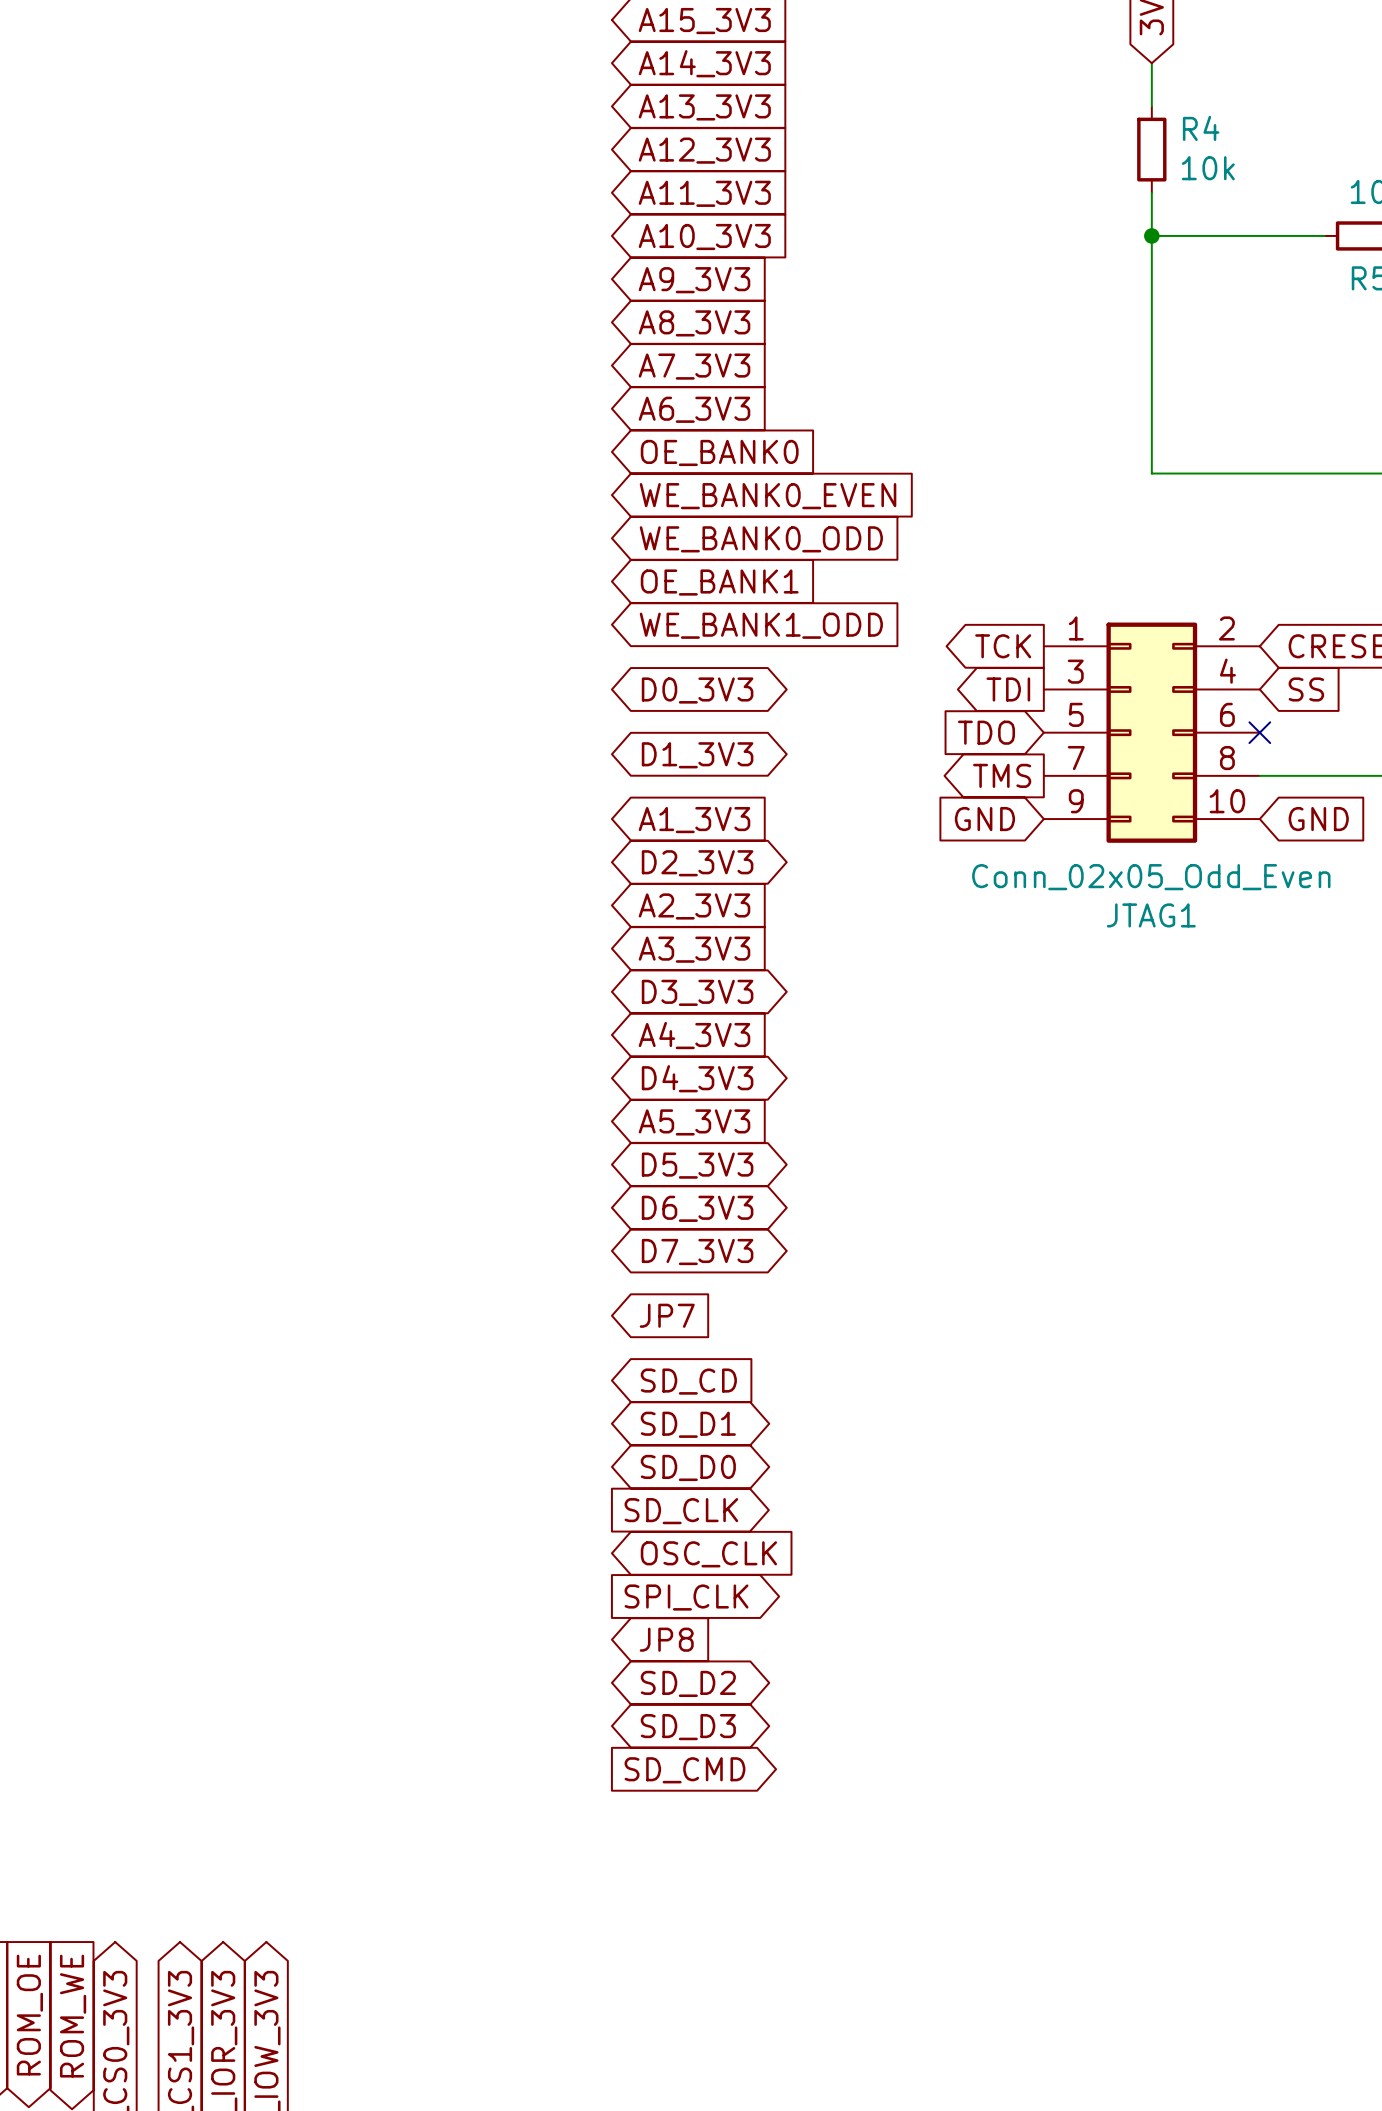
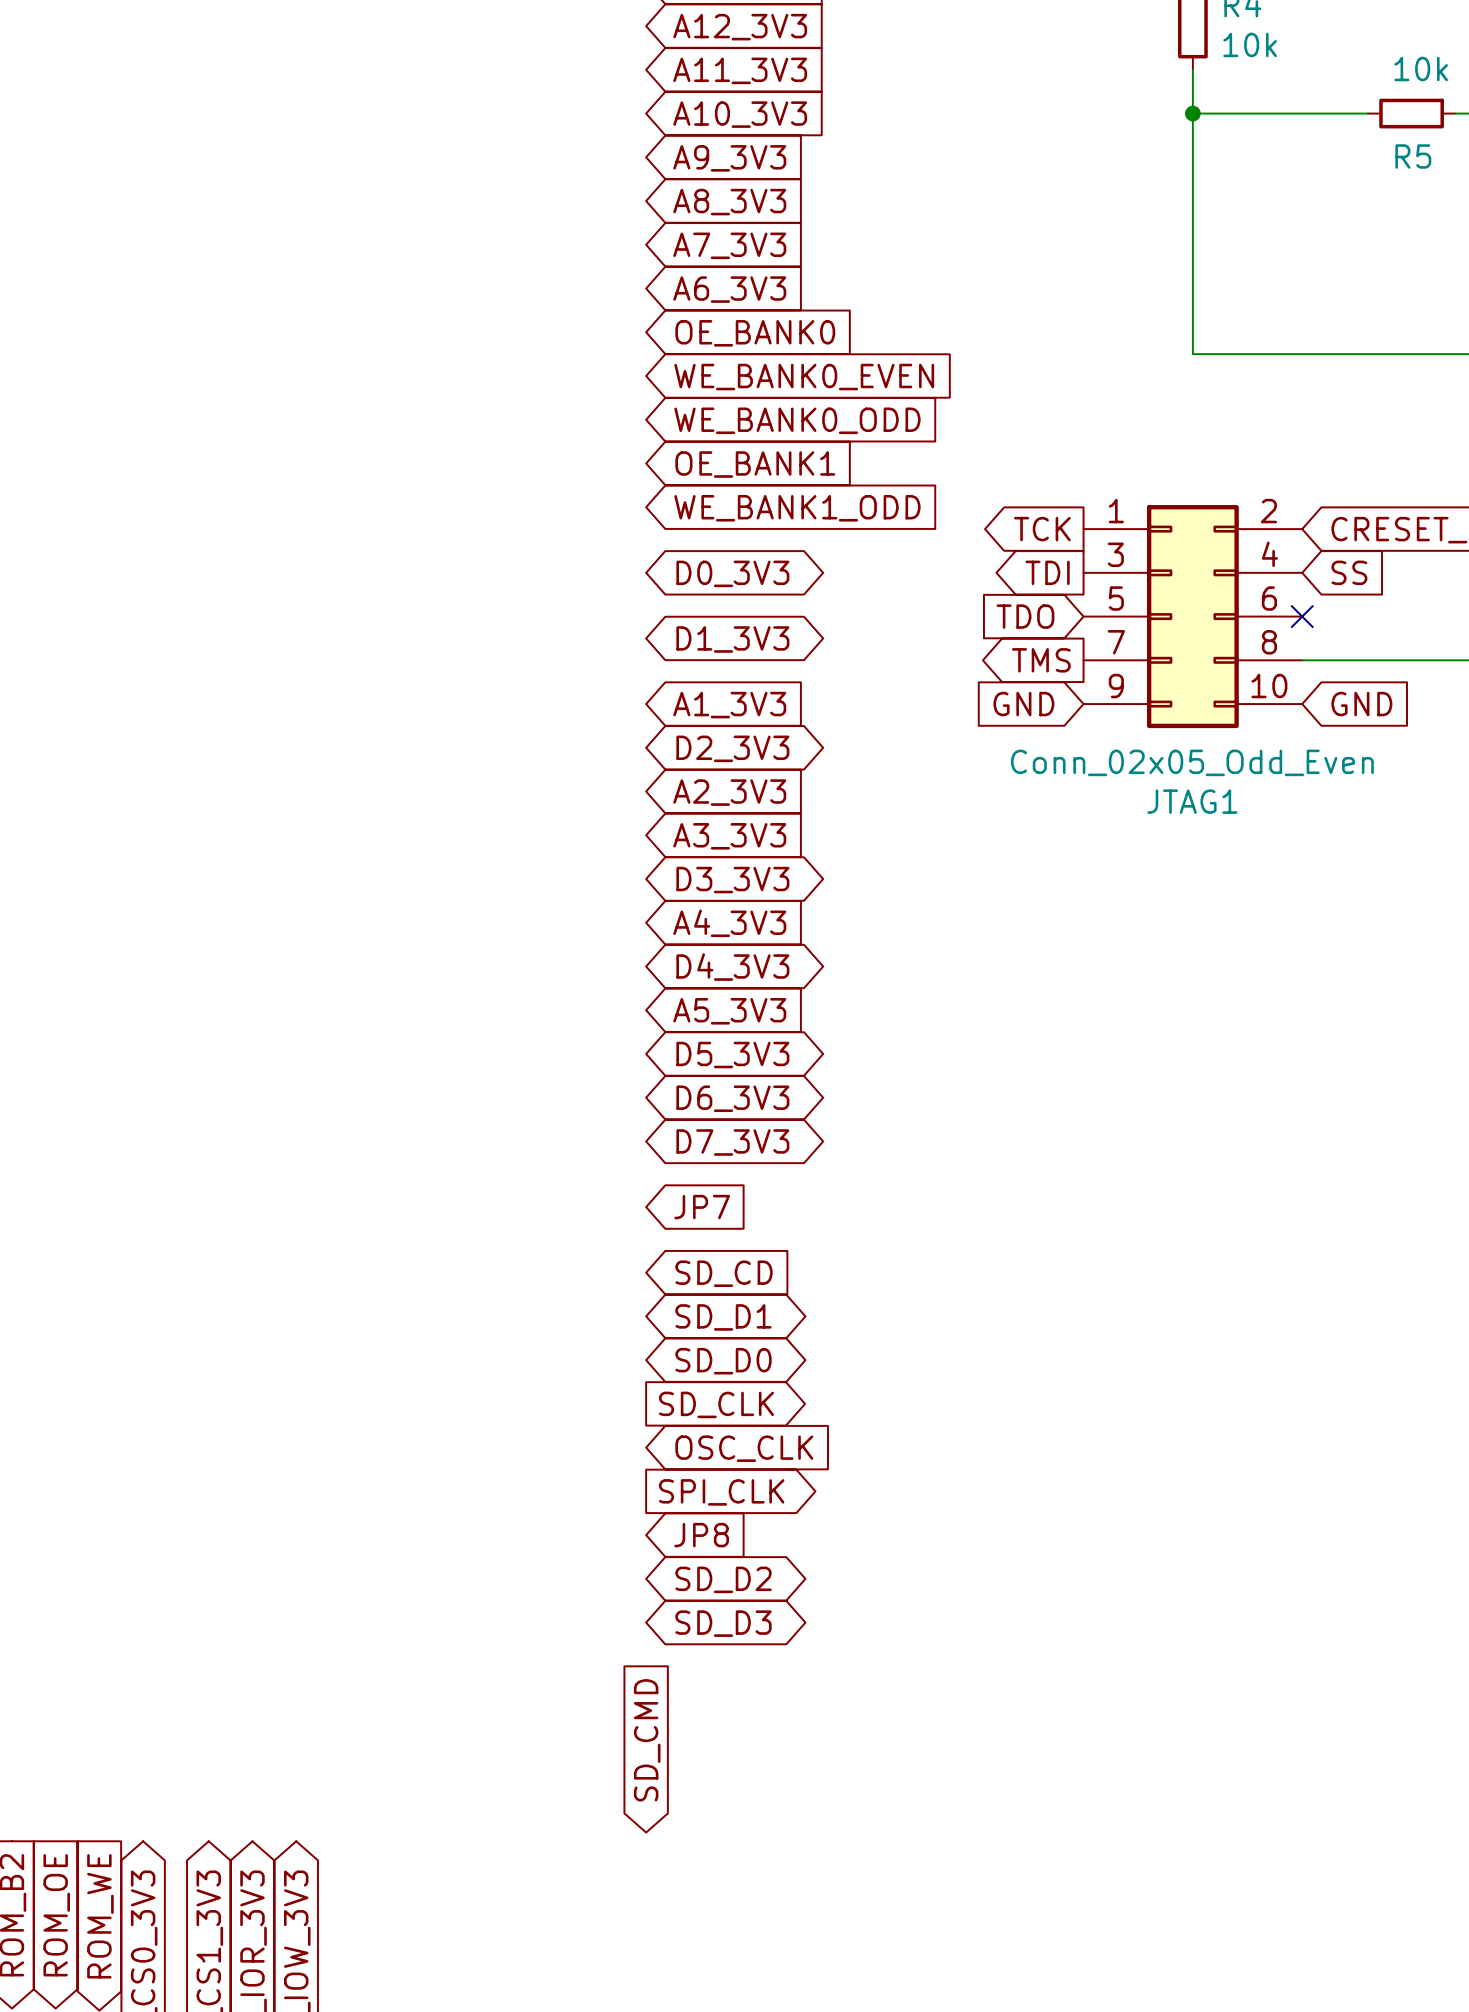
global label rotation: 0° (684, 1770) -> 90° clockwise (647, 1740)

